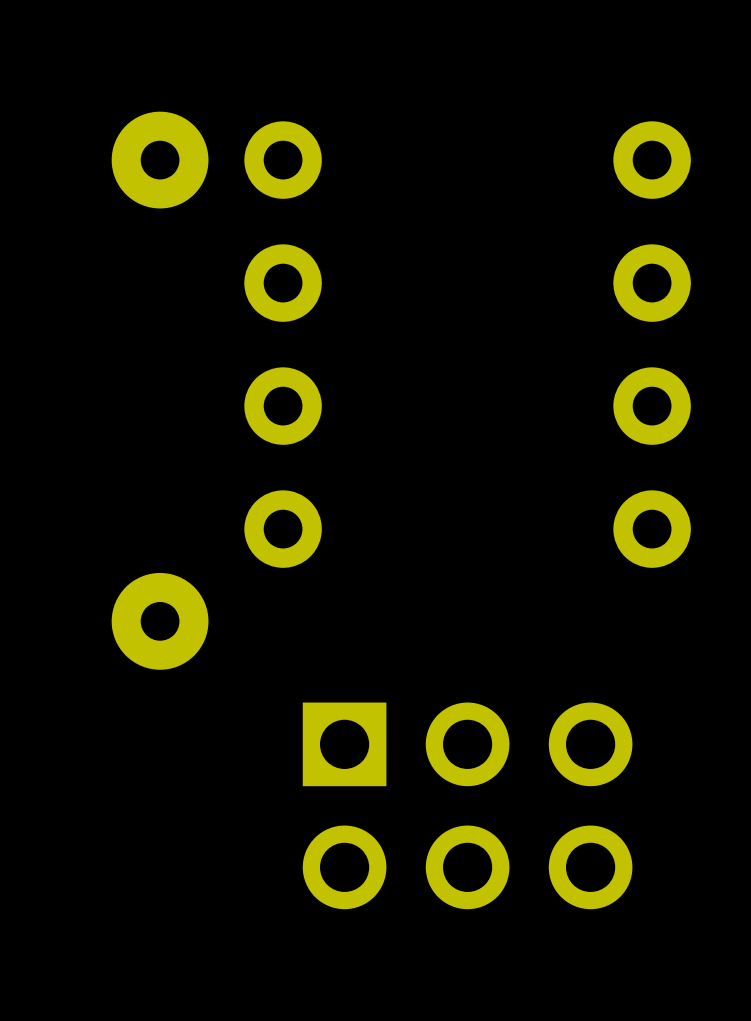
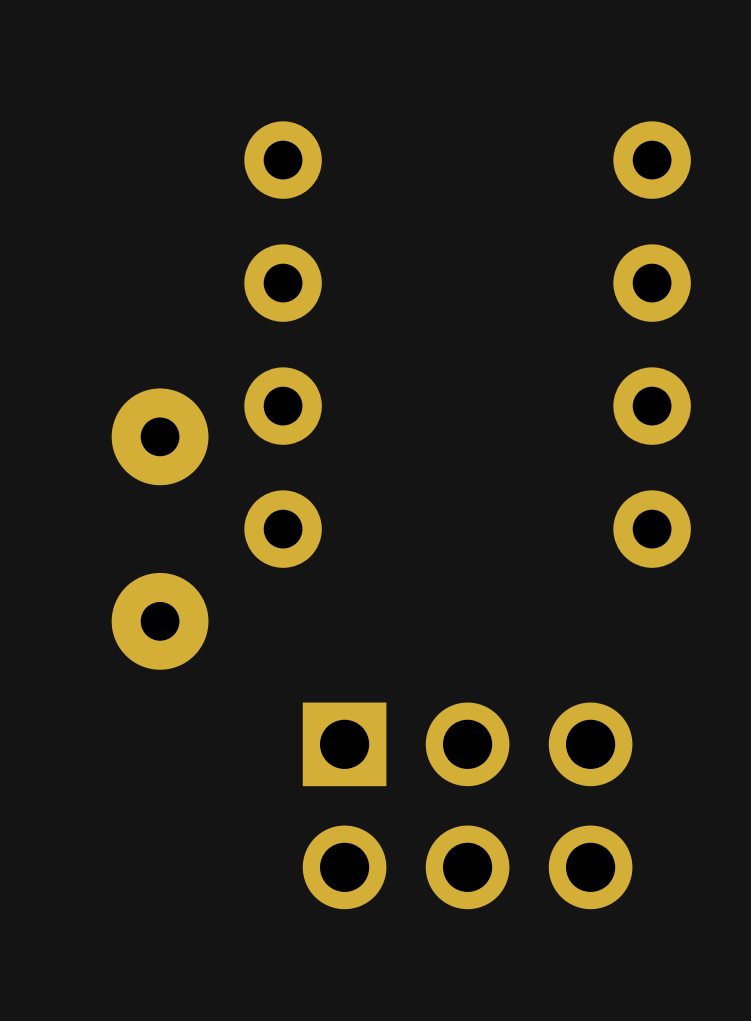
part: (160, 160) -> none
part: none -> (160, 529)

